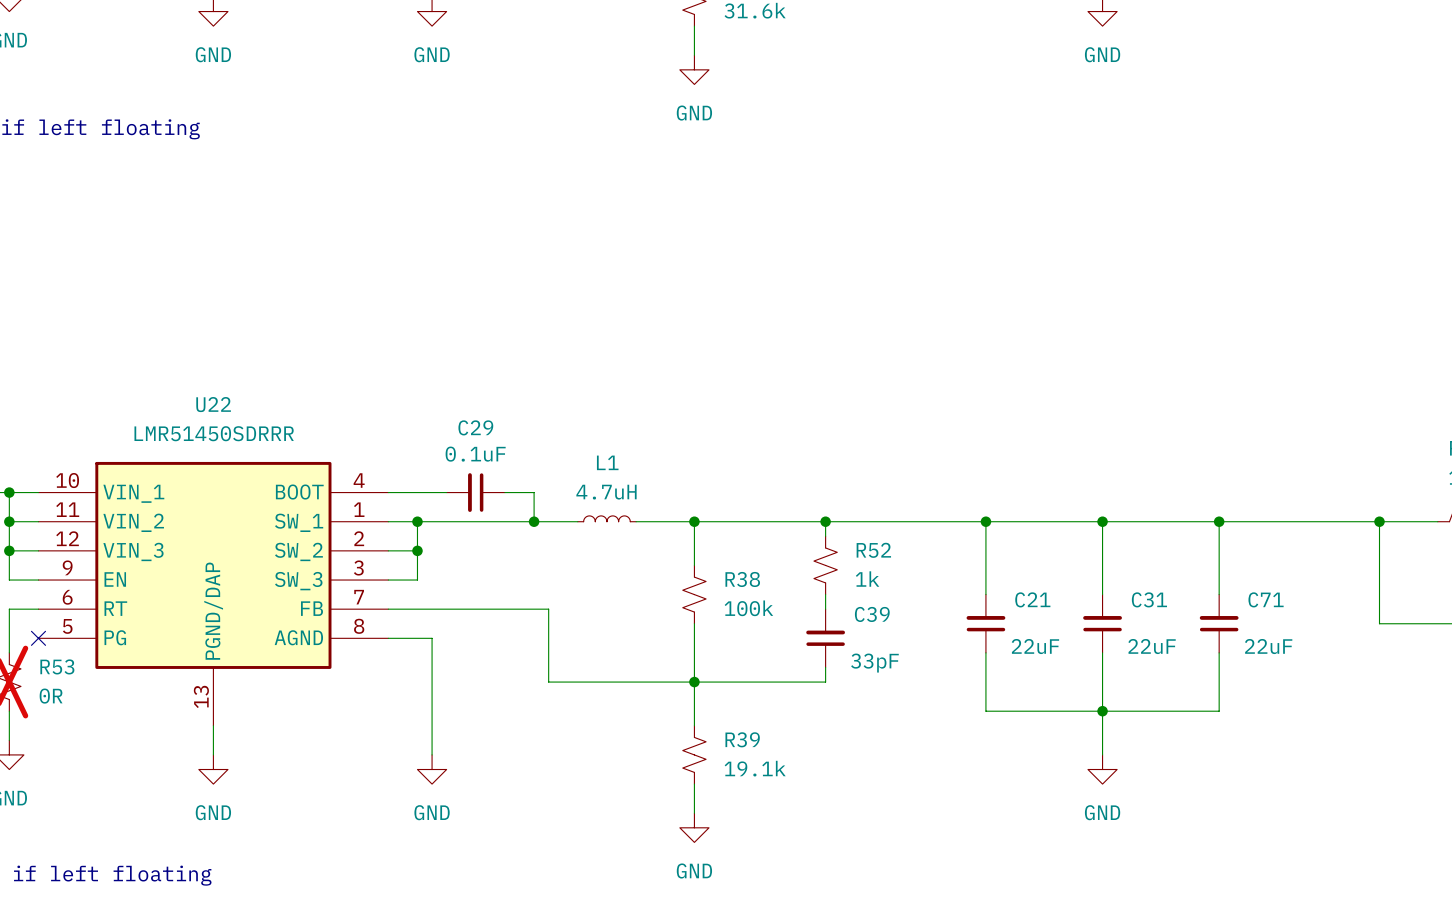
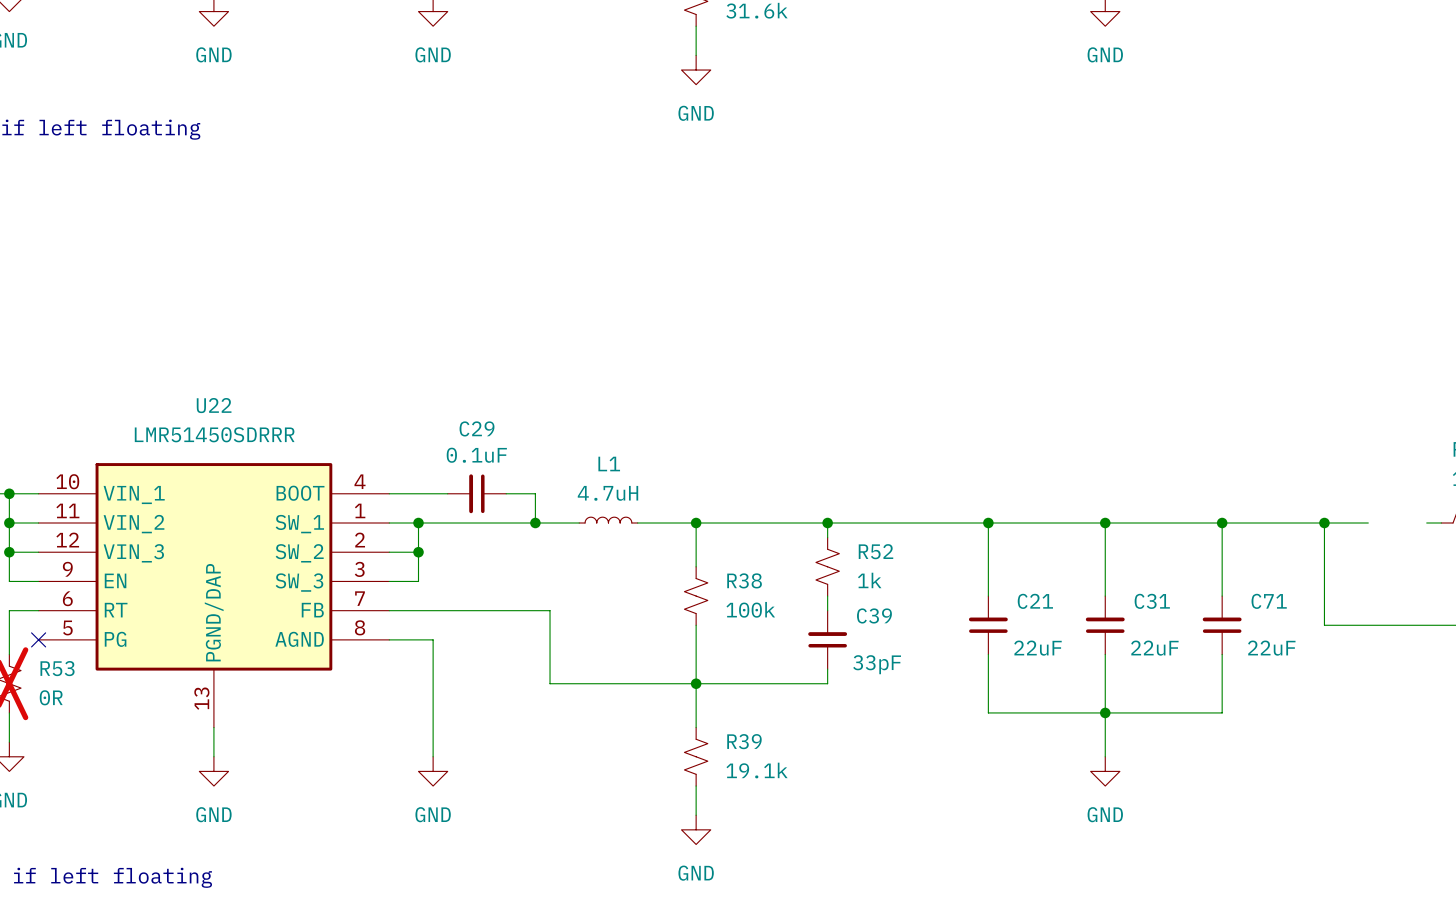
junction: none -> (1324, 523)
wire: (1364, 521) (1423, 521) -> none
wire: (1379, 521) (1379, 623) -> (1324, 523) (1324, 625) (1382, 625)
junction: (1379, 521) -> none

